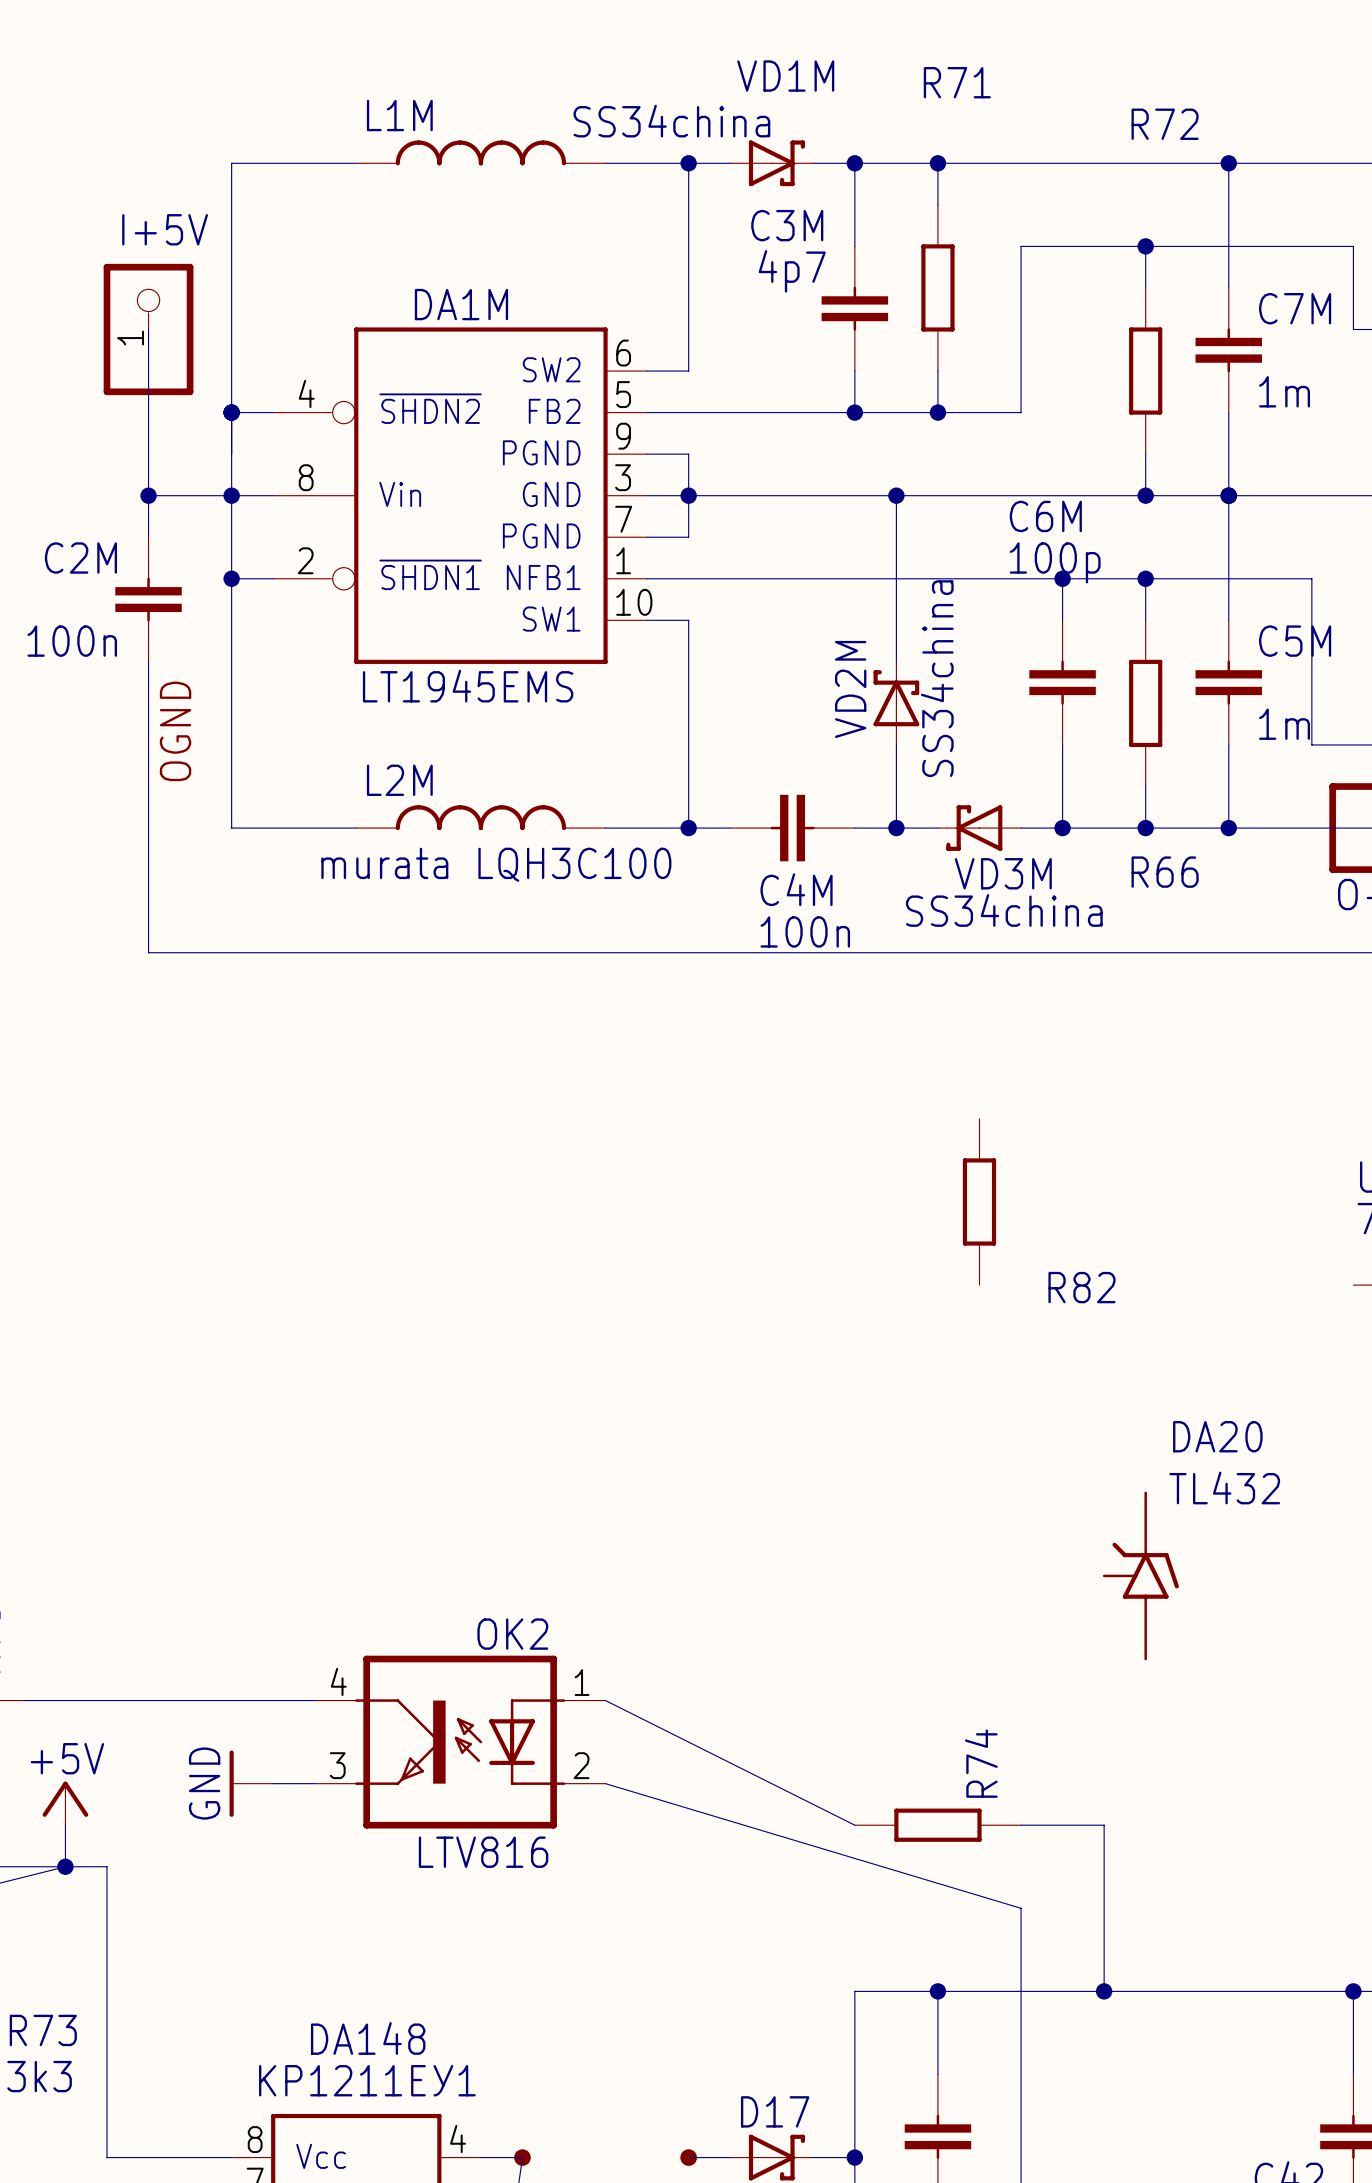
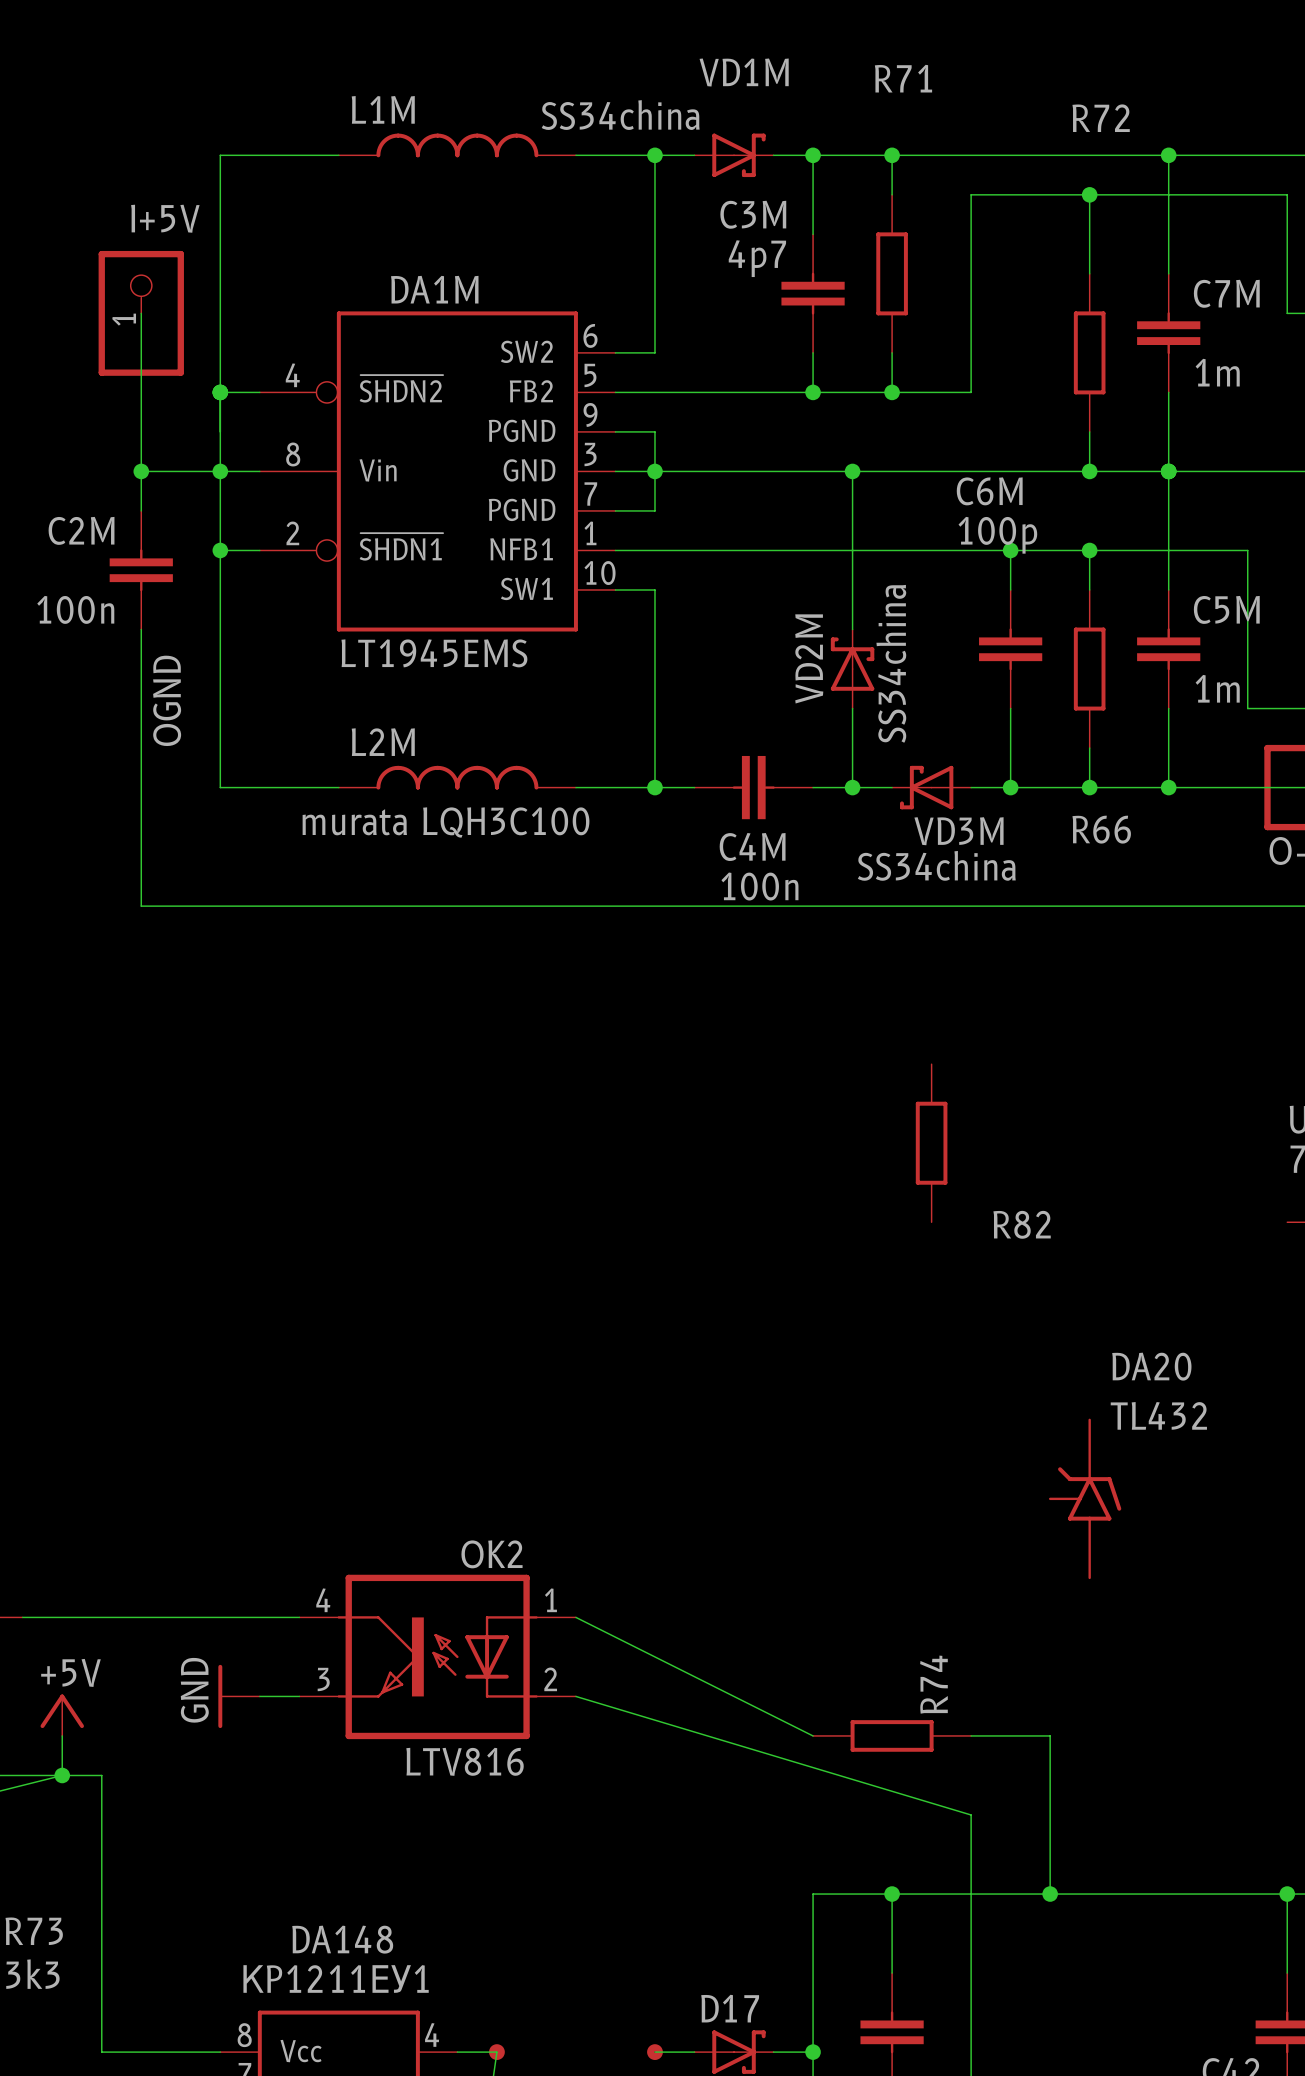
wire: none -> (1089, 194) (1089, 234)
wire: (1021, 246) (1353, 246) -> (971, 234) (971, 194) (1287, 194) (1287, 234)
junction position: (1145, 246) -> (1089, 194)

